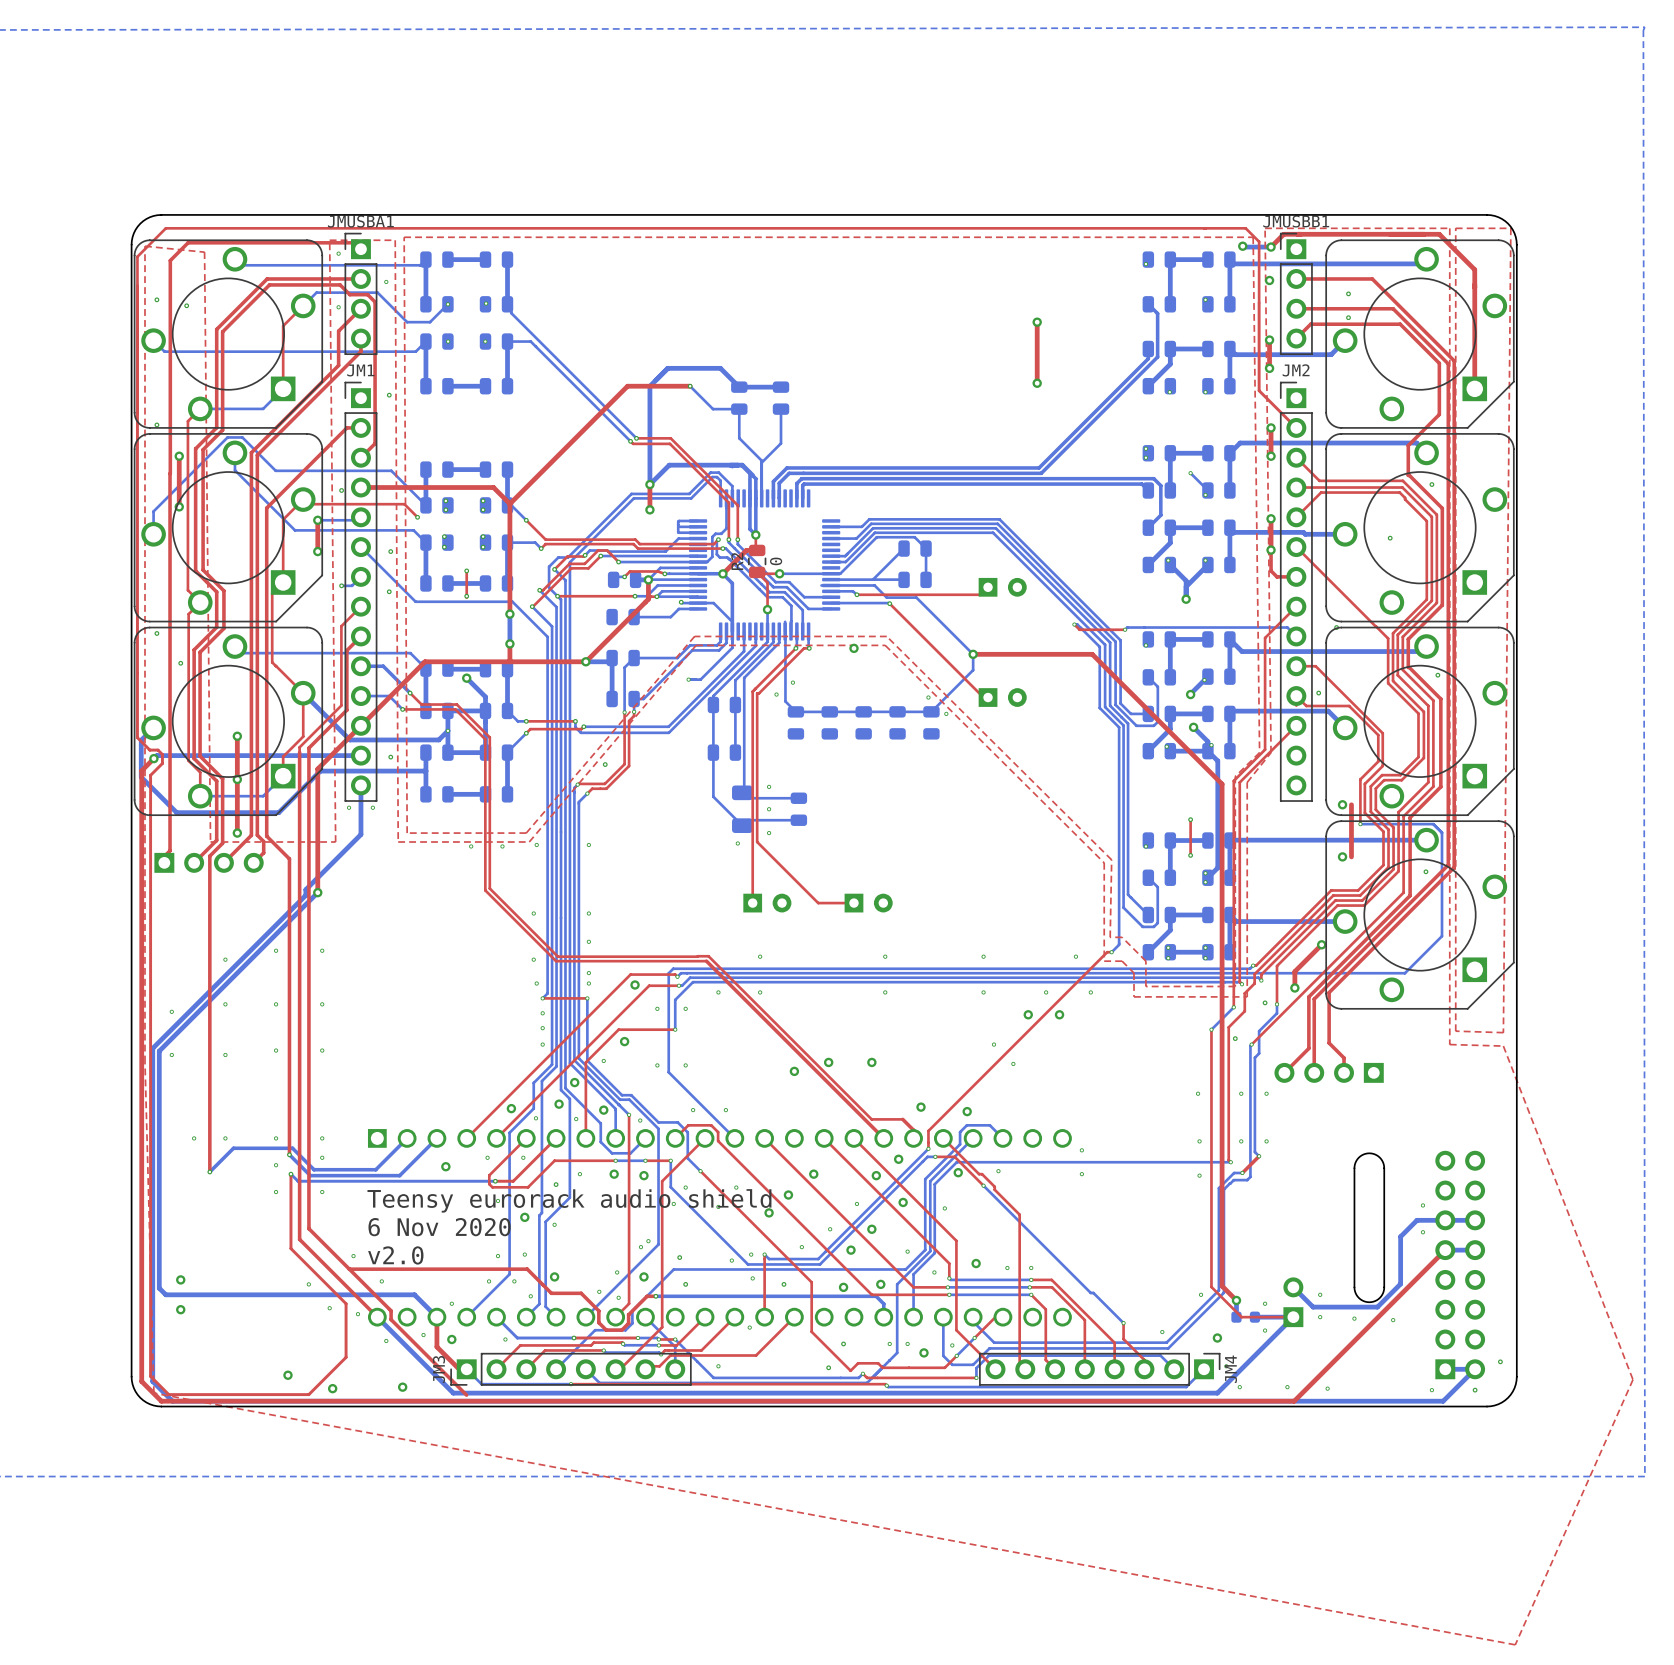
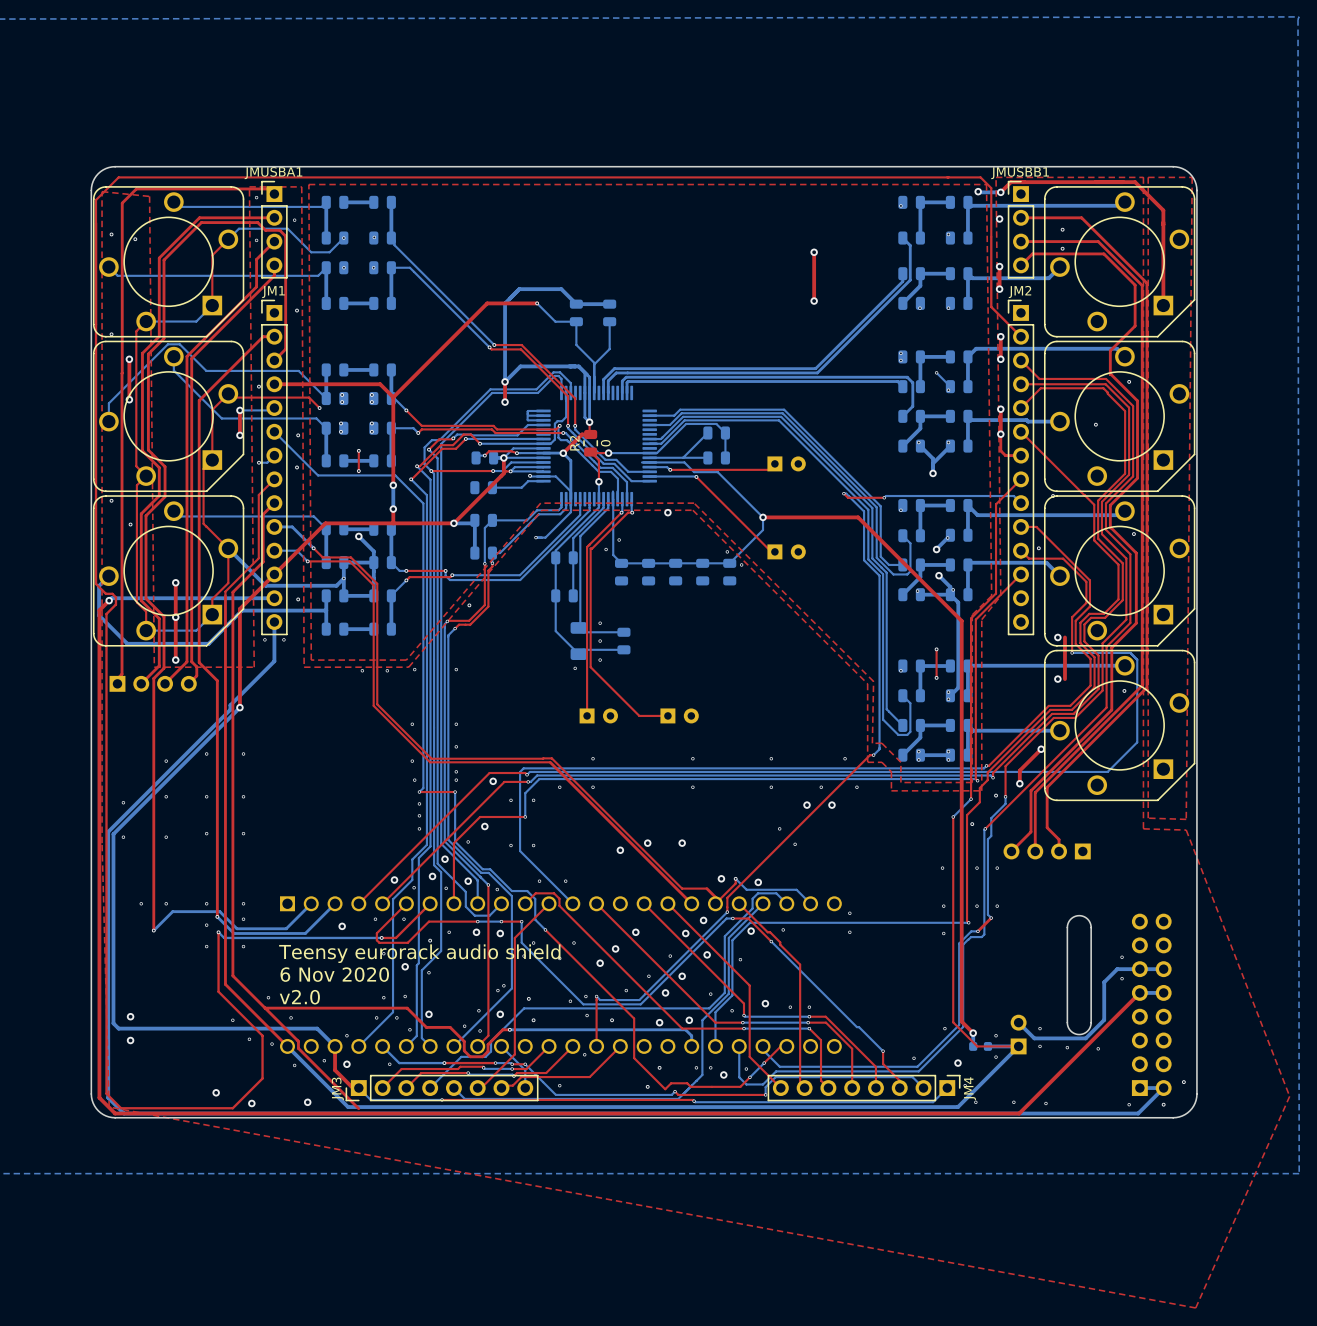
top track: none -> (735, 878) (735, 883) (715, 903)
bottom track: none -> (735, 878) (746, 889) (796, 889) (810, 903)
via: none -> (735, 878)

